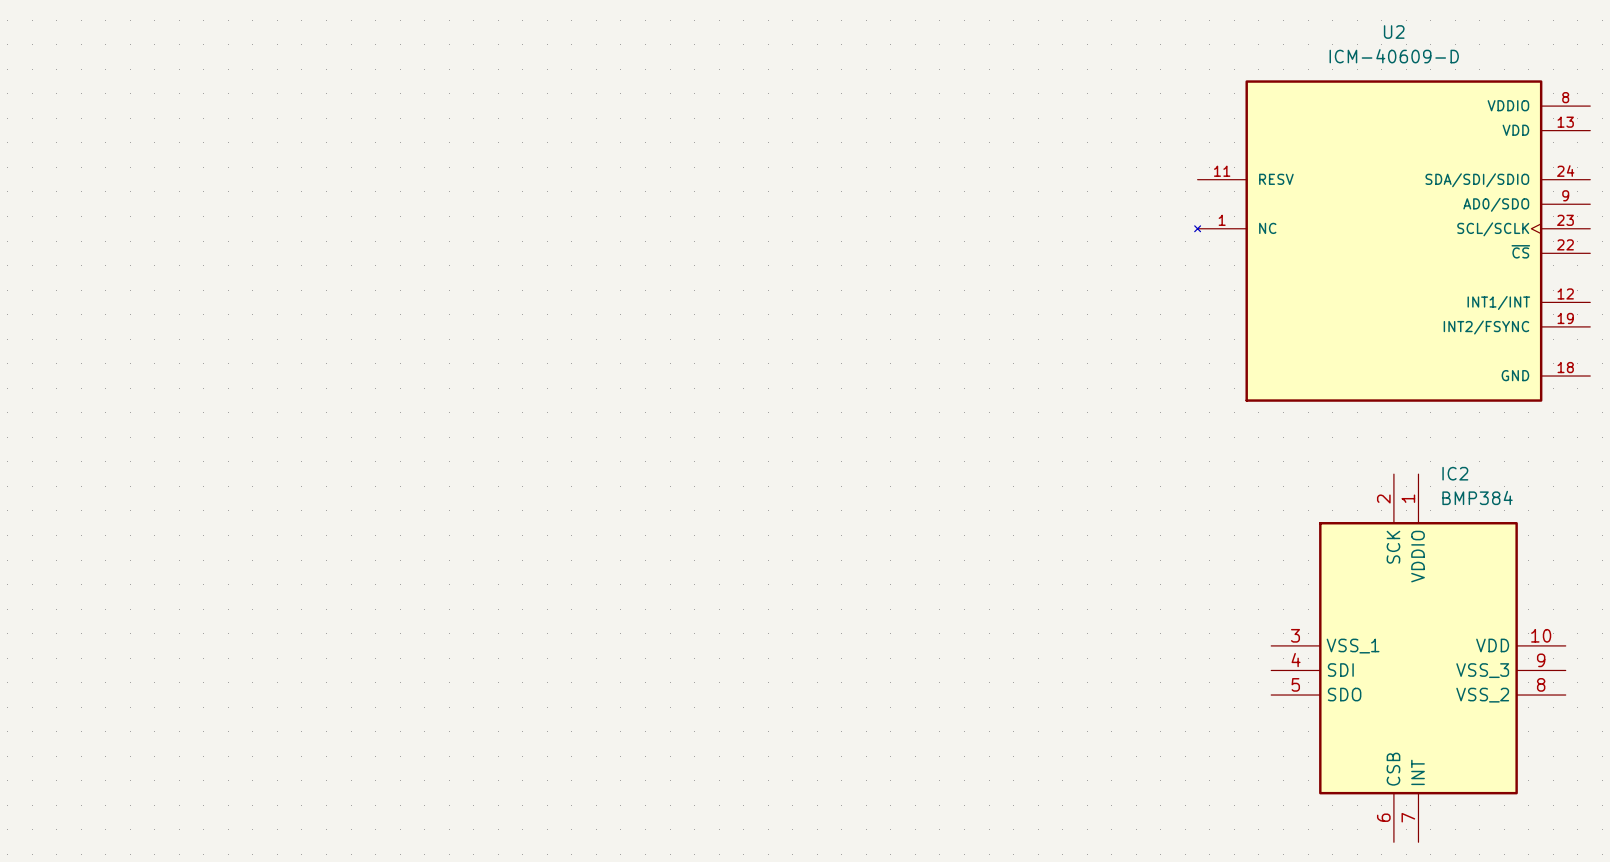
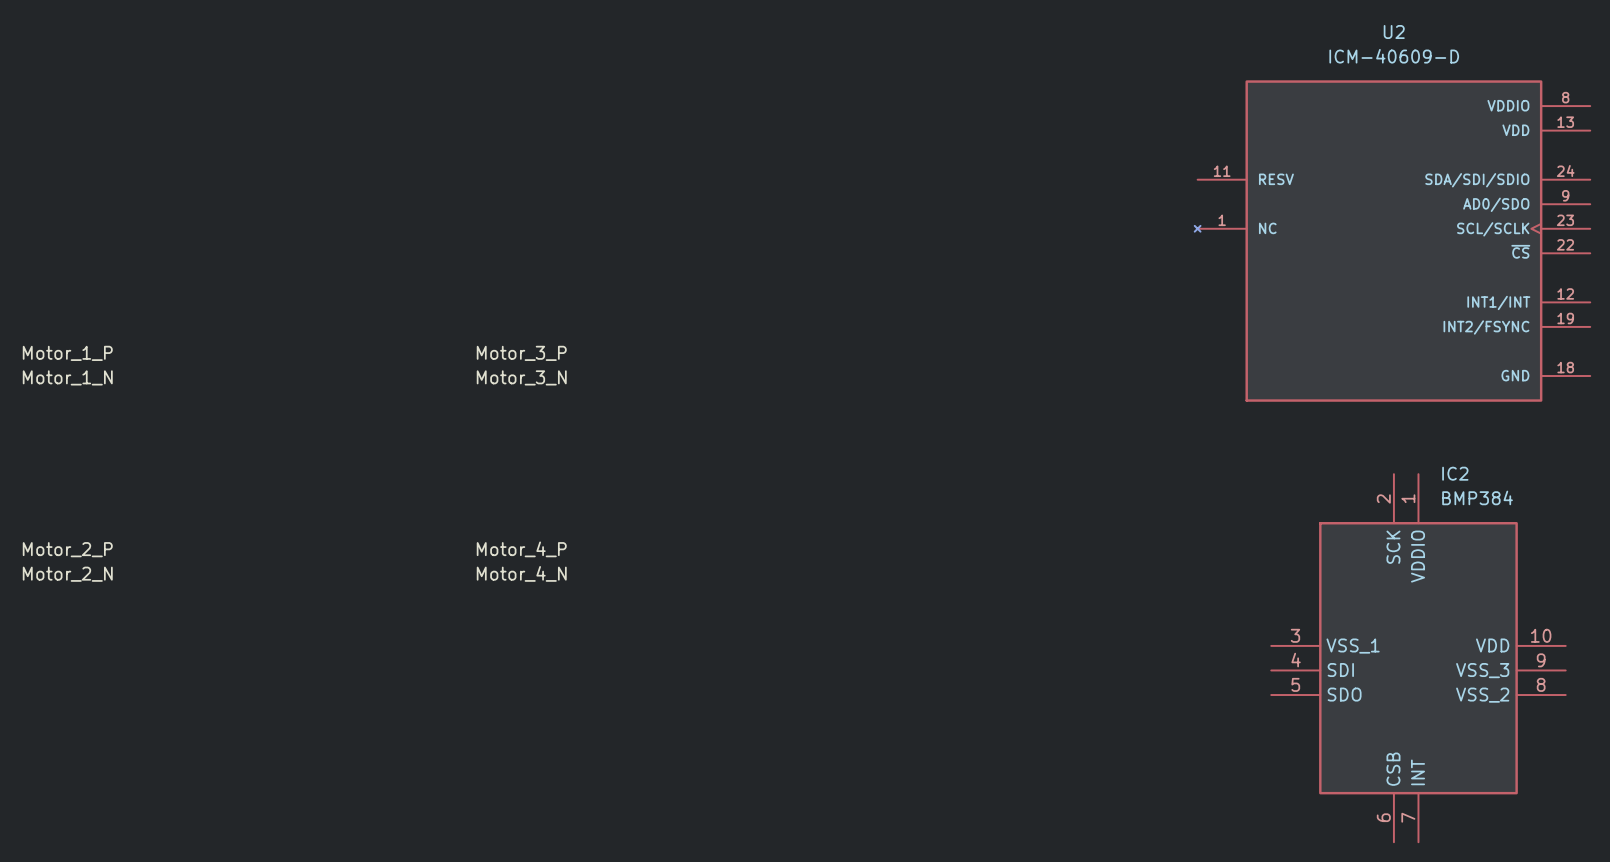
label: none -> Motor_1_P (67, 353)
label: none -> Motor_3_P (521, 353)
label: none -> Motor_1_N (67, 377)
label: none -> Motor_3_N (521, 377)
label: none -> Motor_2_P (67, 549)
label: none -> Motor_4_P (521, 549)
label: none -> Motor_4_N (521, 573)
label: none -> Motor_2_N (67, 574)

